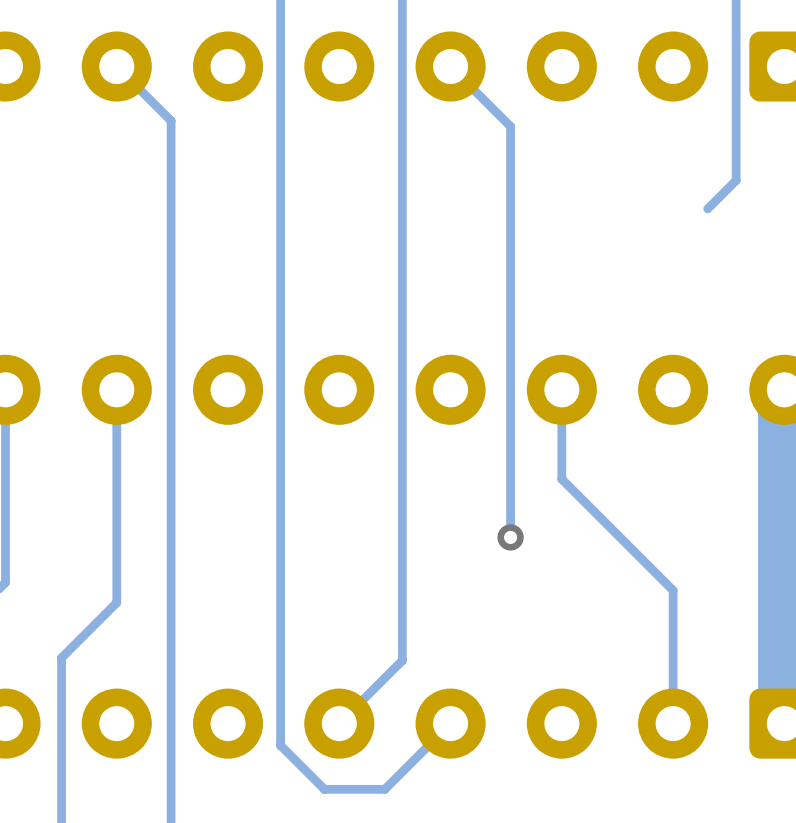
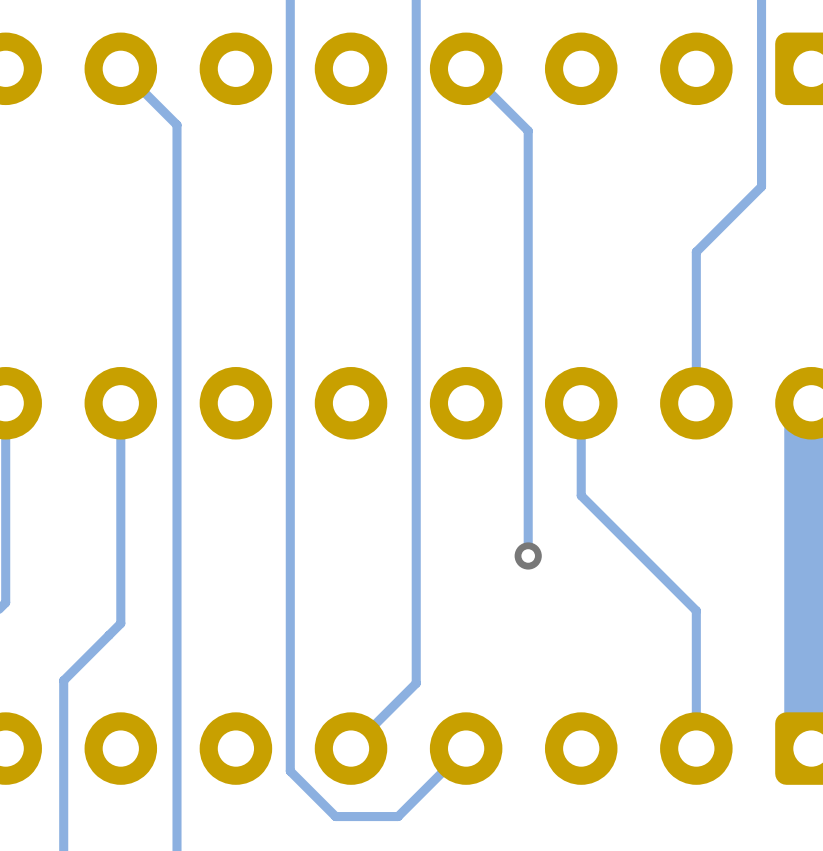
bottom track: none -> (732, 216) (696, 251) (696, 403)

